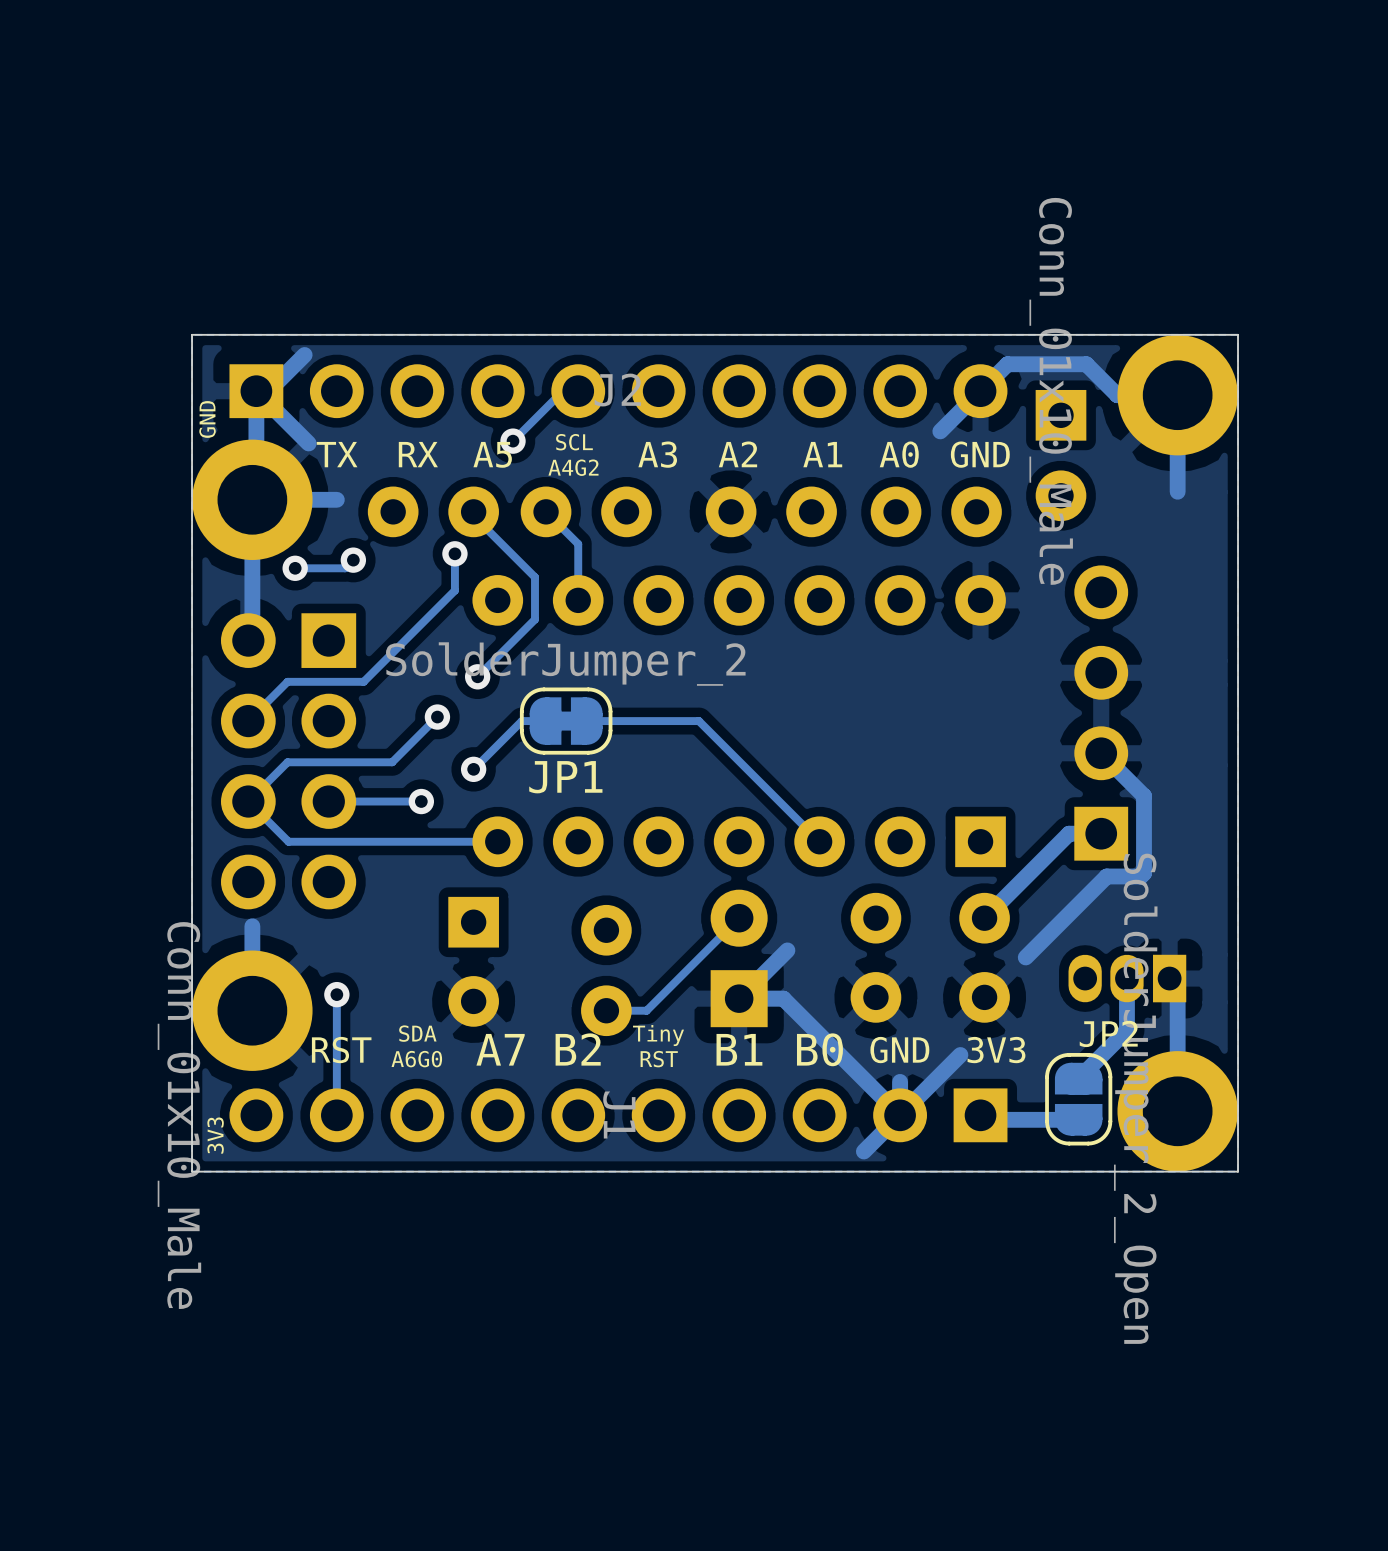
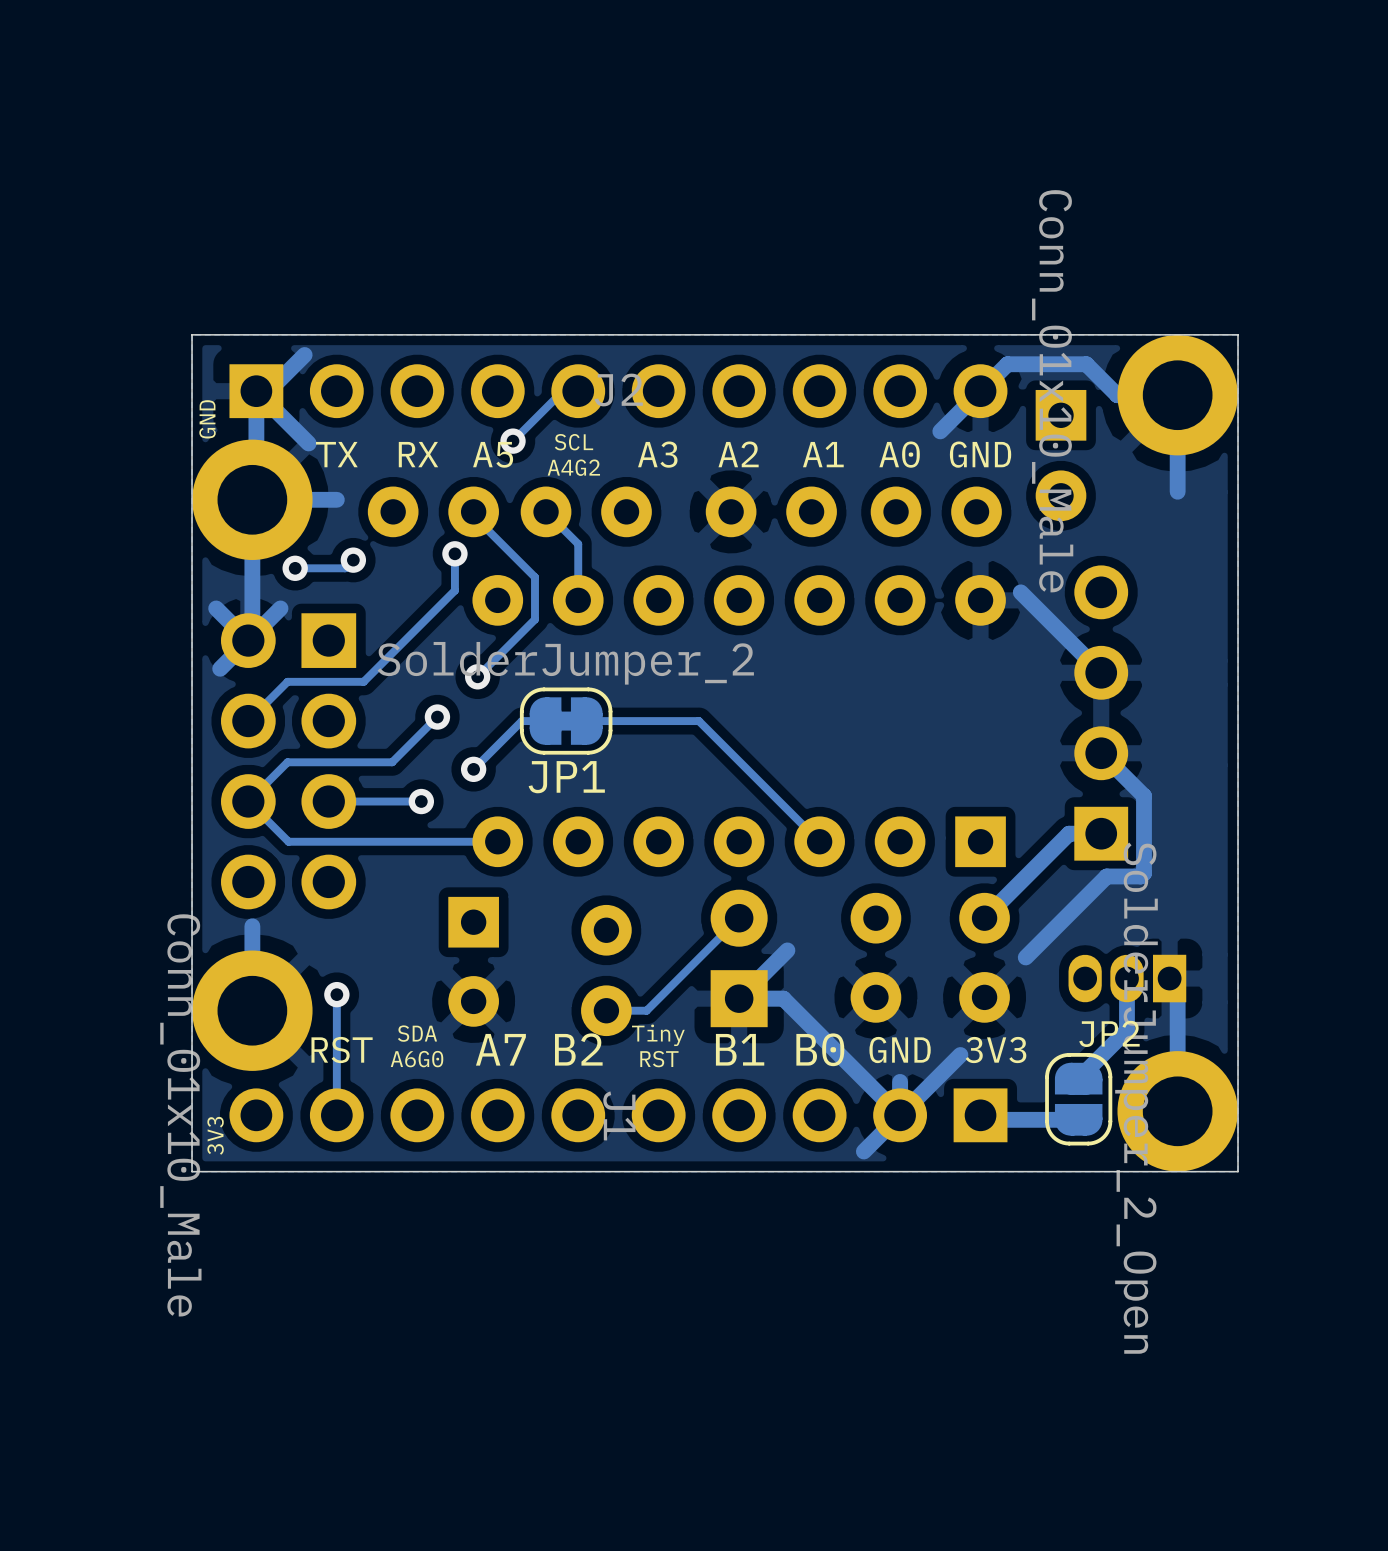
track: none -> (1020, 592) (1101, 672)
track: none -> (216, 608) (248, 640) (220, 668)
track: none -> (280, 608) (252, 636)

